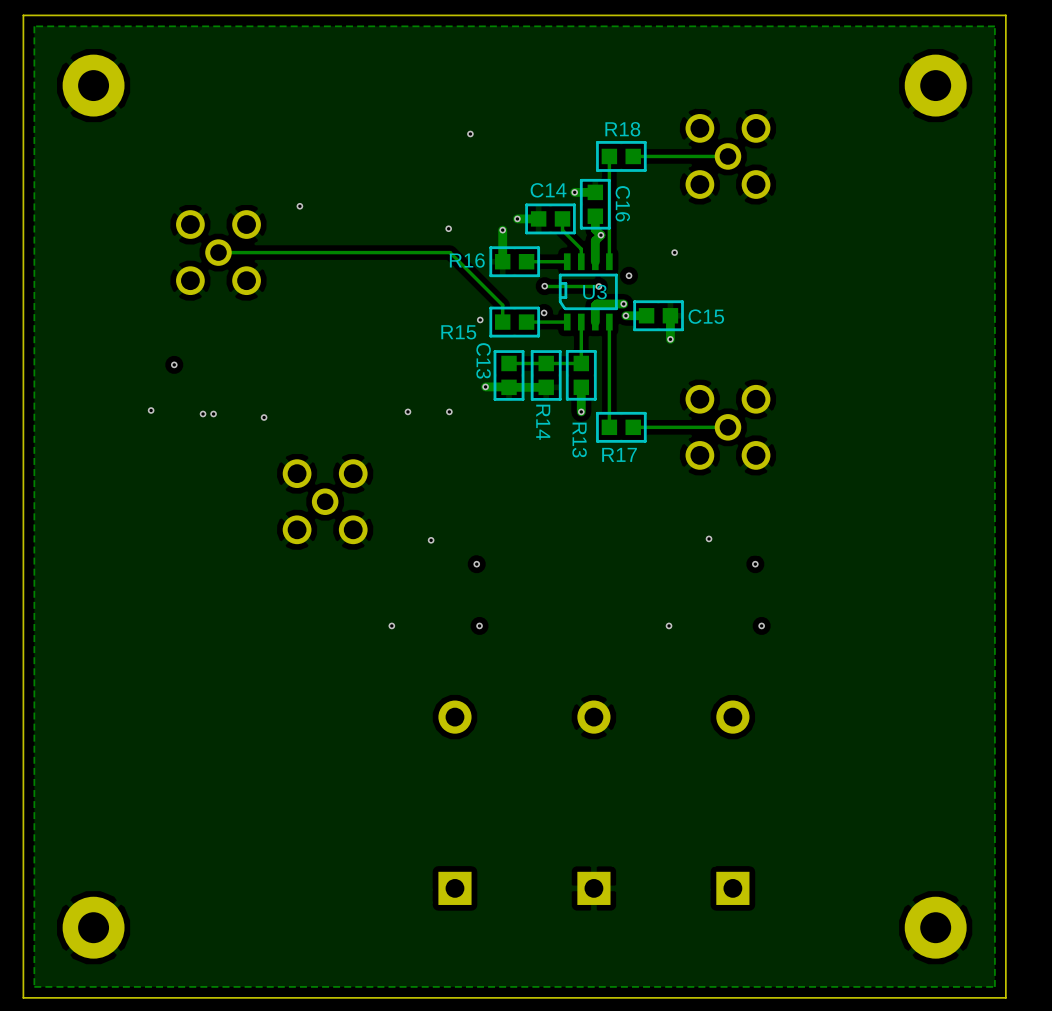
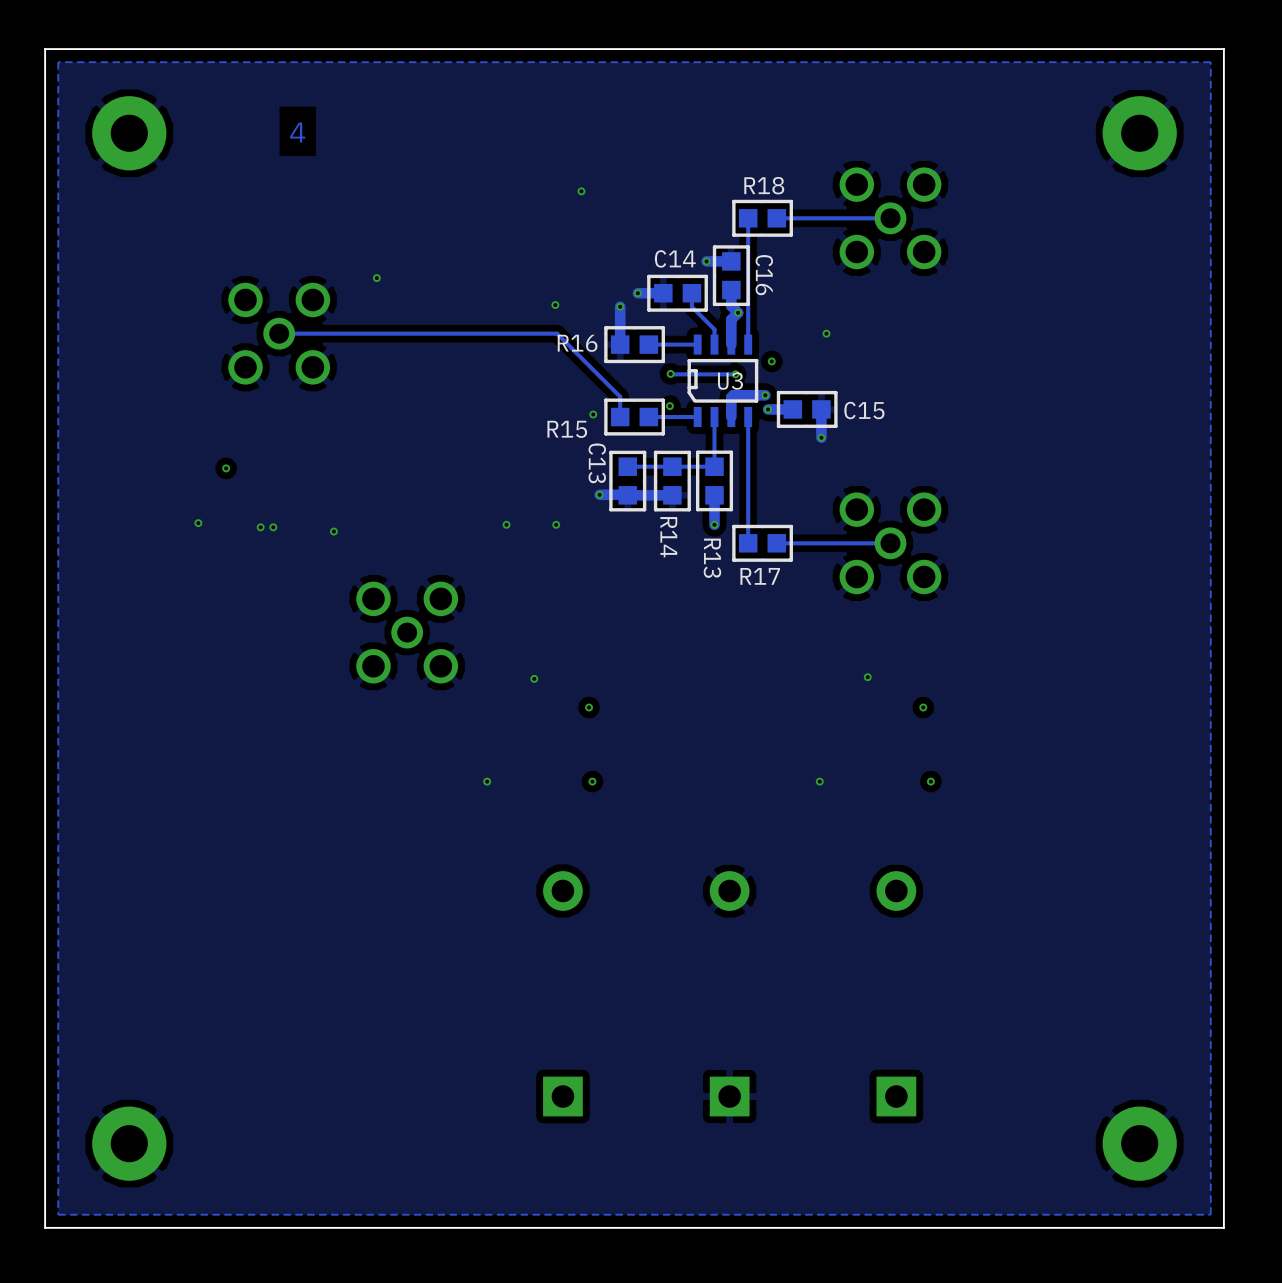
text: none -> 4 (297, 132)

